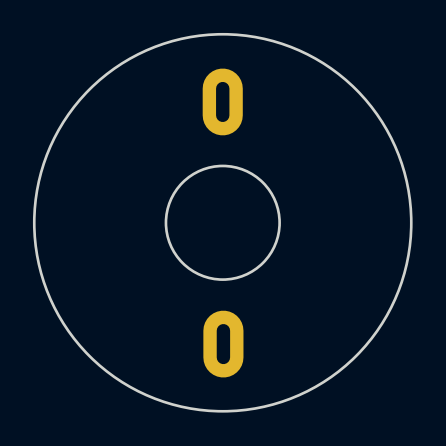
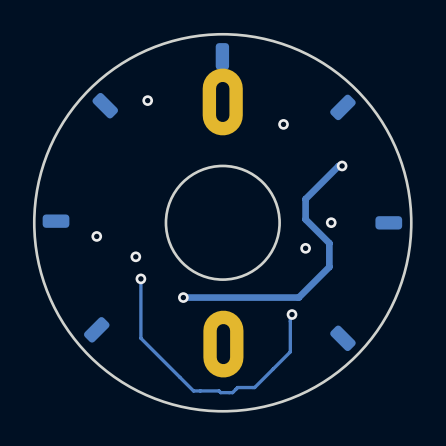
part: none -> (222, 56)
via: none -> (147, 100)
part: none -> (105, 105)
part: none -> (342, 107)
via: none -> (283, 124)
track: none -> (342, 165) (338, 165) (305, 199) (305, 219) (329, 243) (329, 267) (298, 297) (183, 297)
via: none -> (342, 165)
part: none -> (56, 221)
via: none -> (331, 222)
part: none -> (388, 222)
via: none -> (96, 236)
via: none -> (305, 248)
via: none -> (135, 256)
track: none -> (140, 278) (140, 338) (193, 390) (232, 392) (237, 387) (254, 387) (290, 351) (290, 316) (292, 314)
via: none -> (140, 278)
via: none -> (183, 297)
via: none -> (292, 314)
part: none -> (96, 329)
part: none -> (342, 338)

